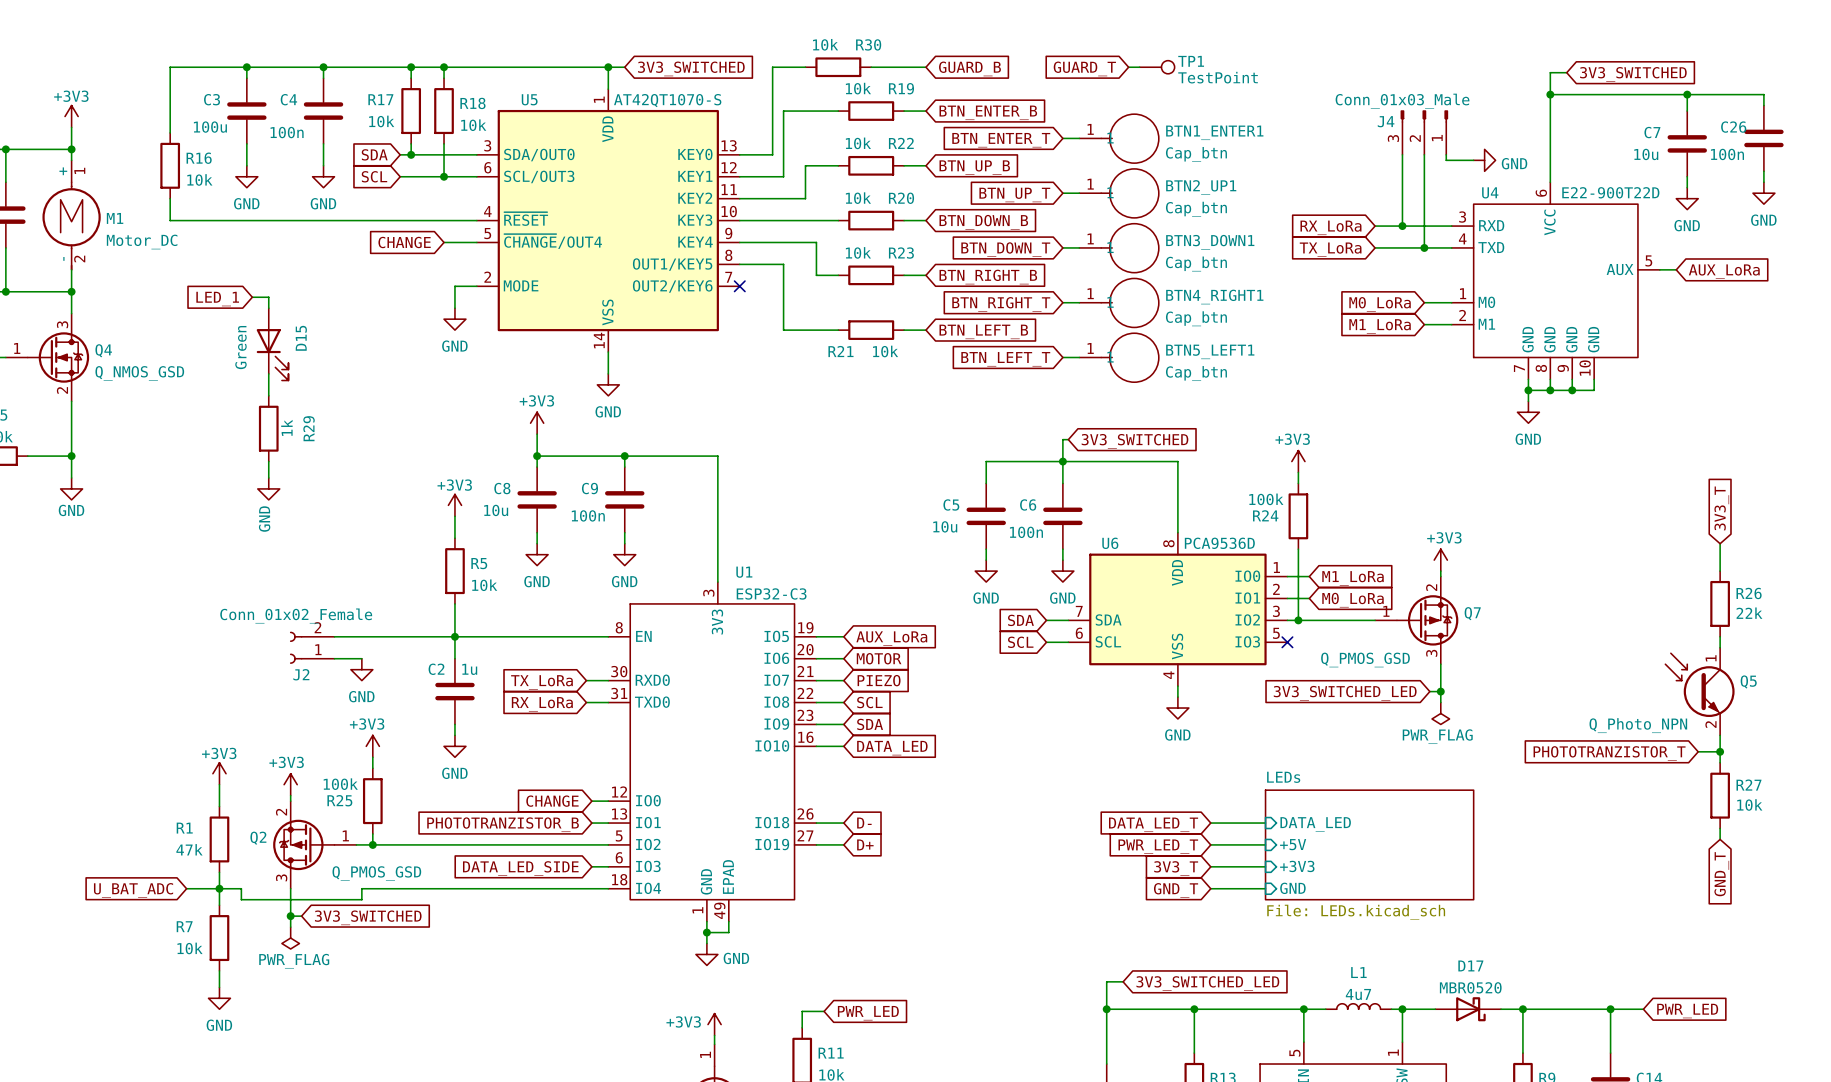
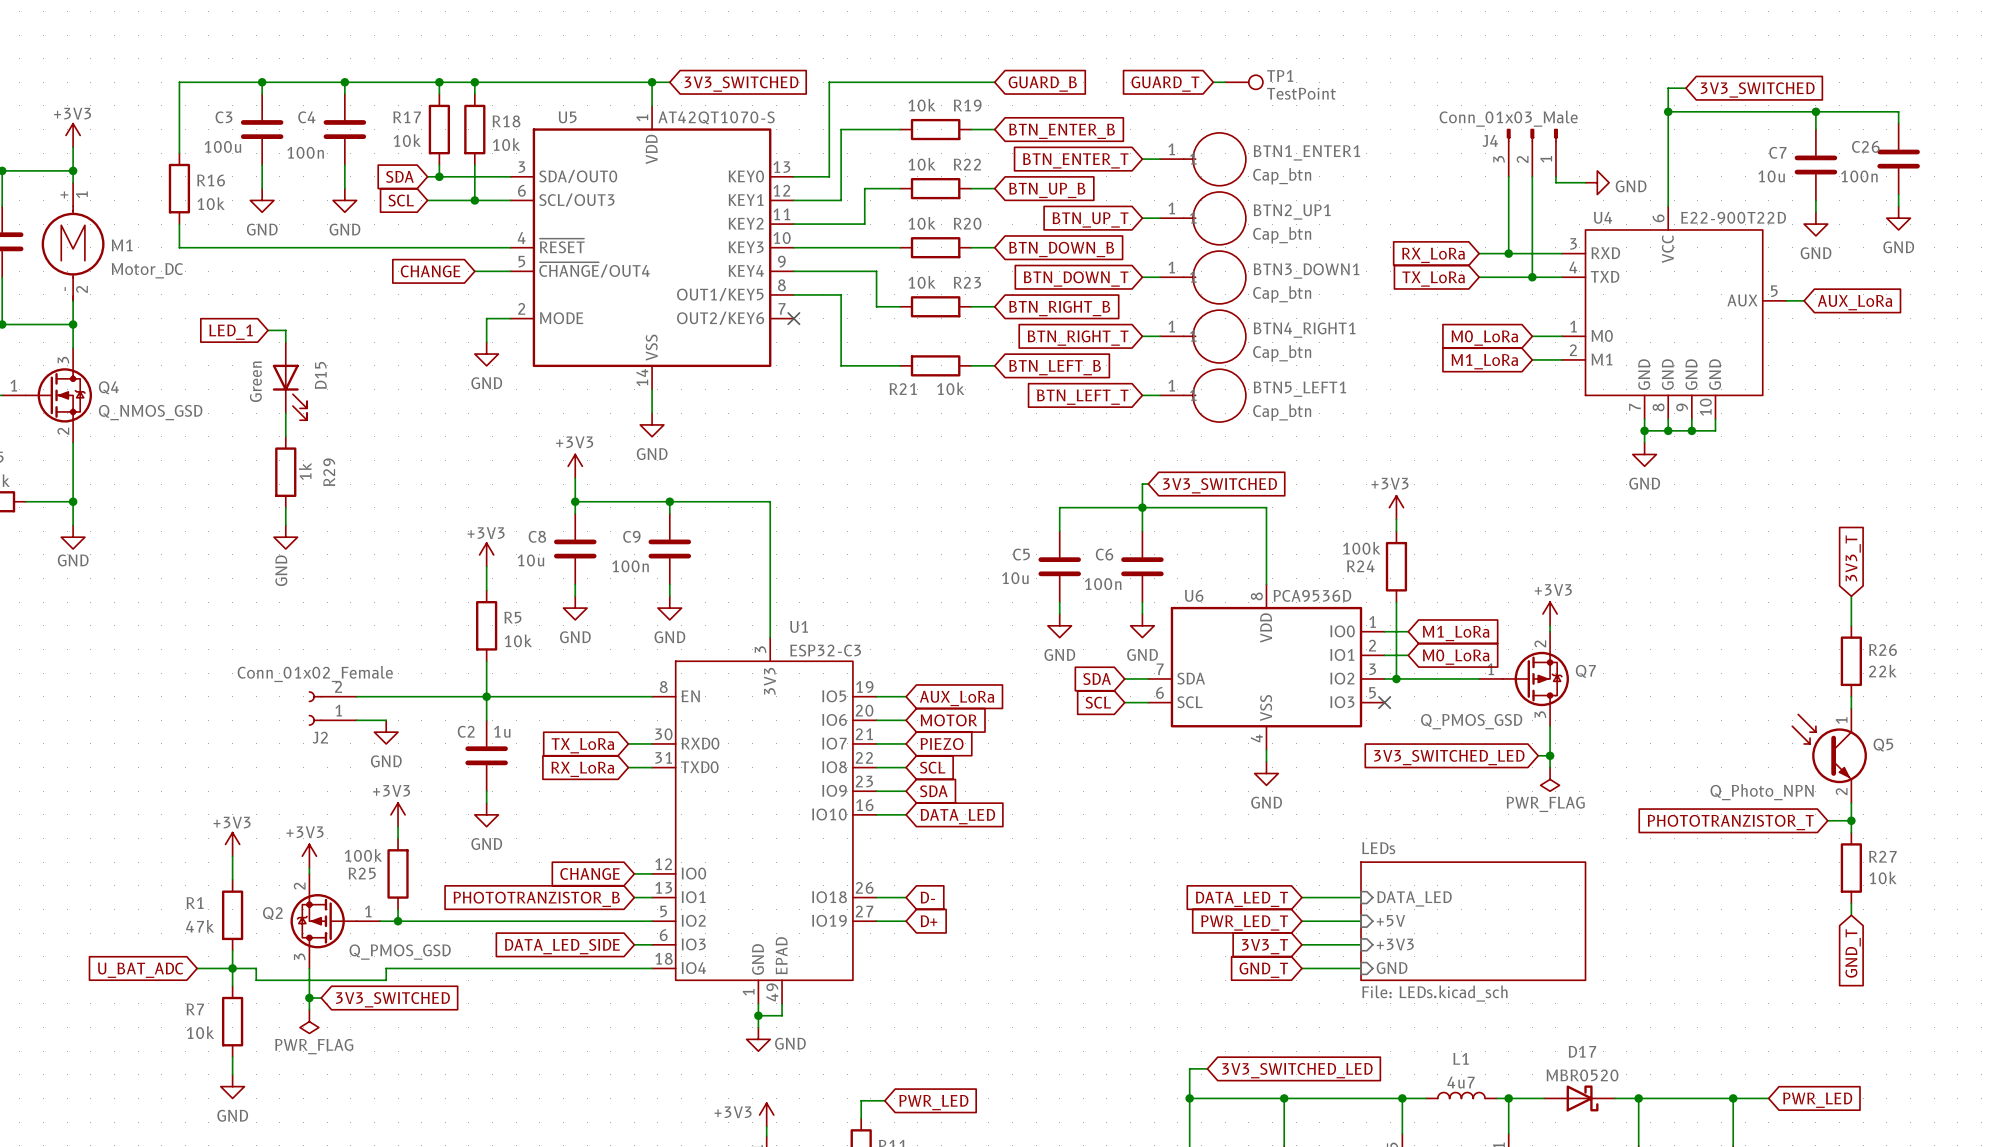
wire: none -> (864, 82) (935, 82)
R30: 10k (838, 67) -> none

